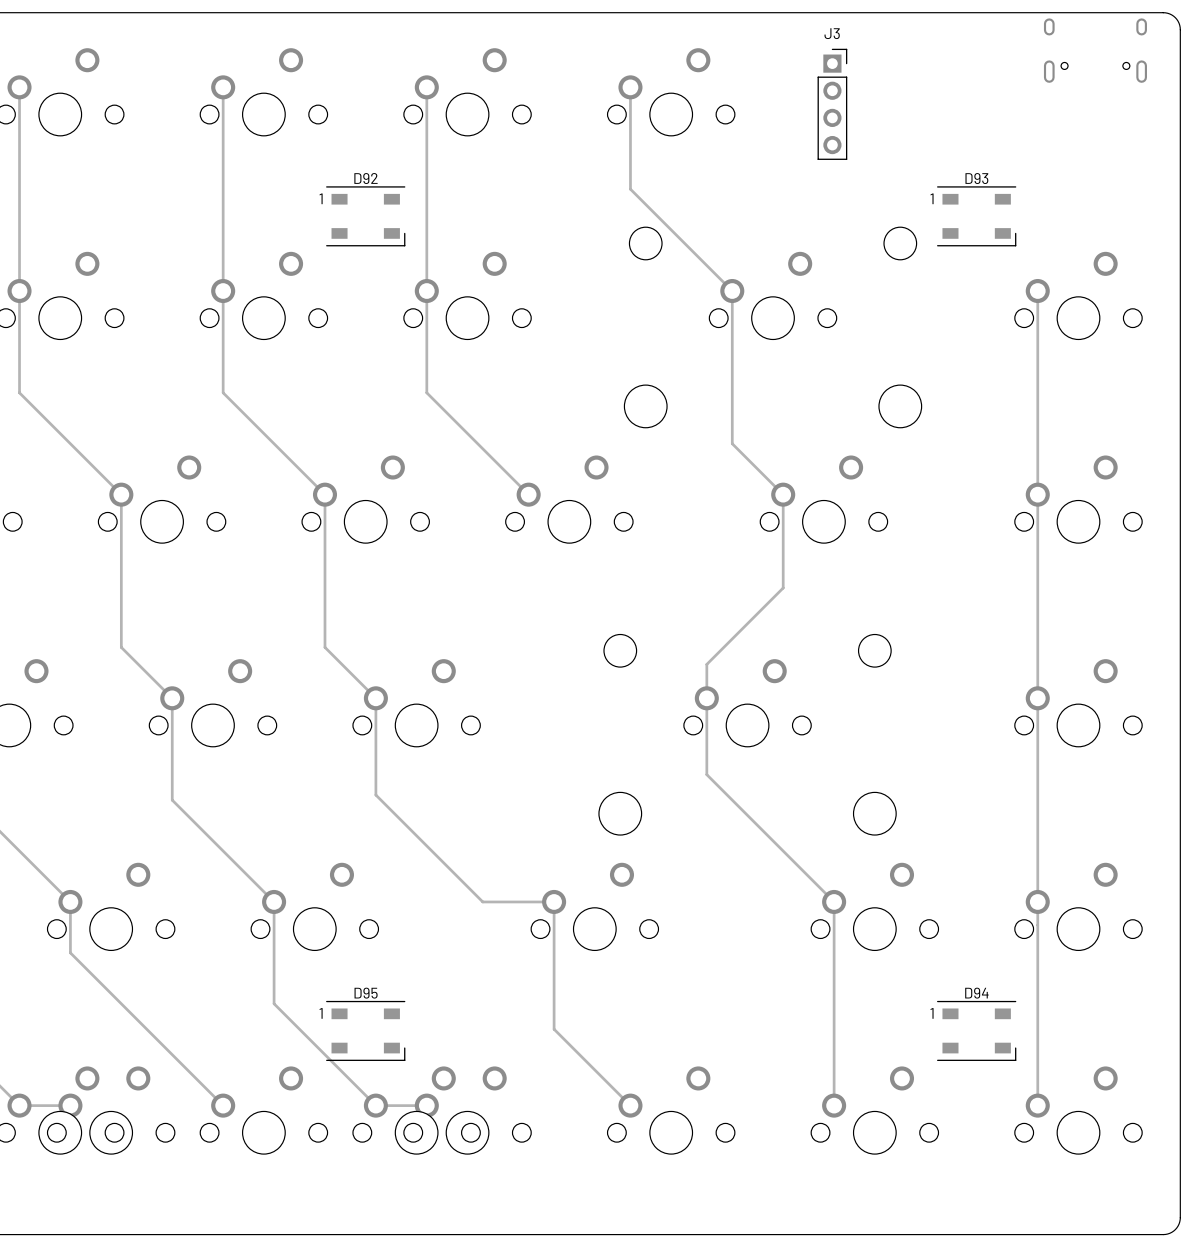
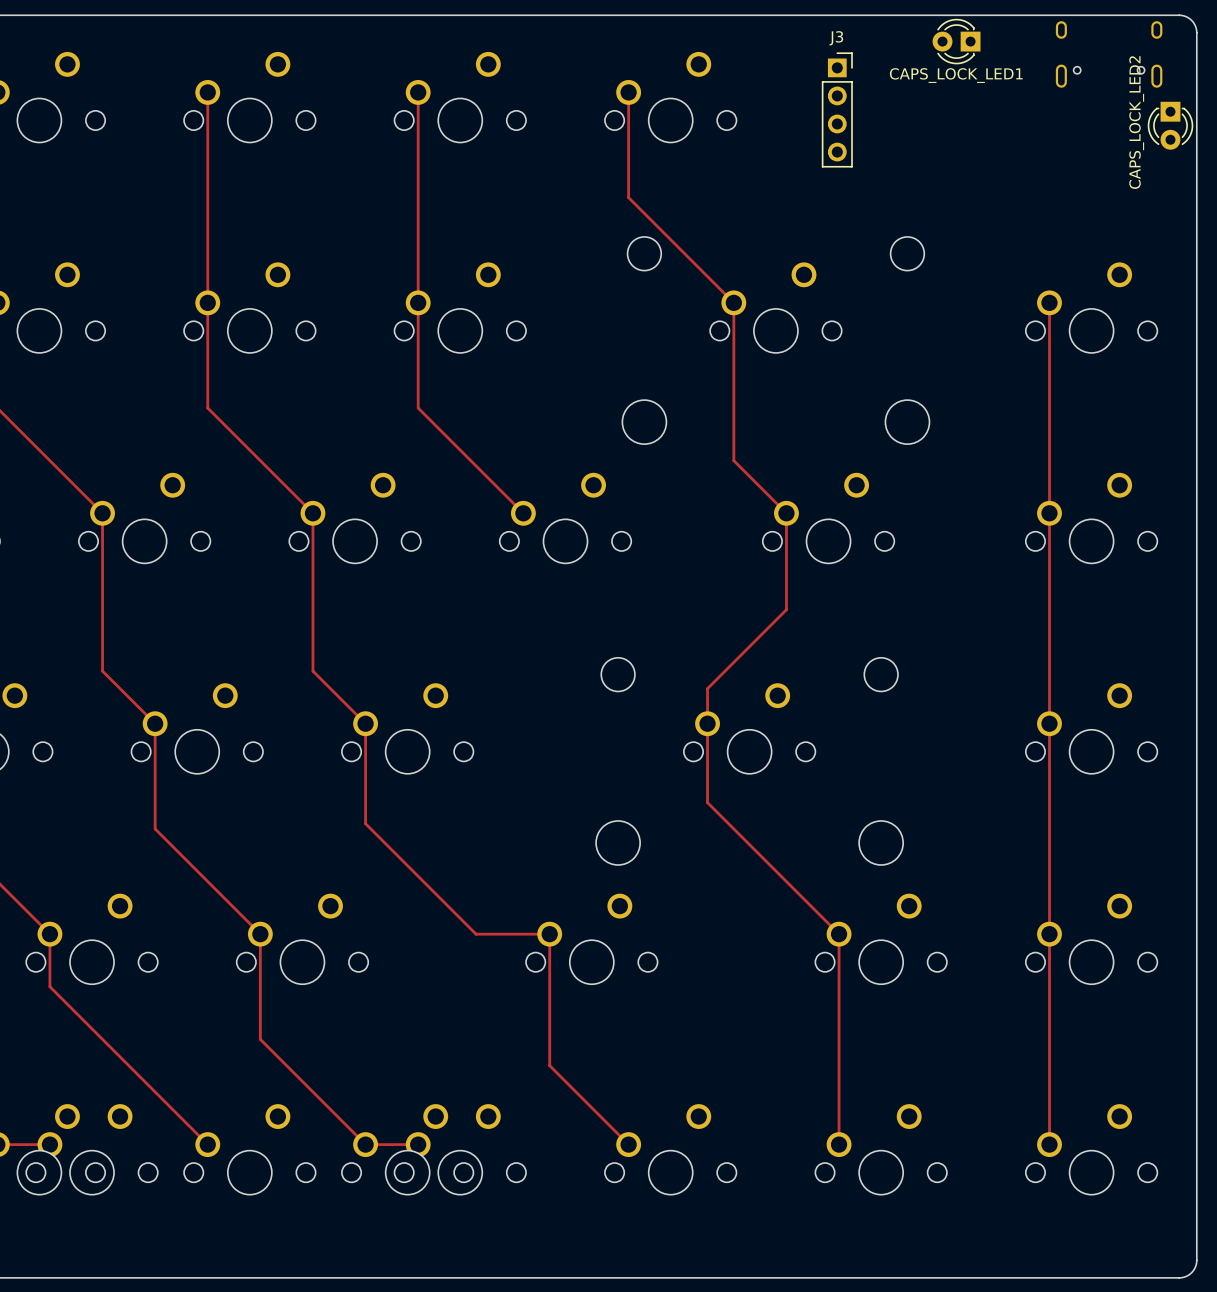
CAPS_LOCK_LED1: none -> (956, 41)
CAPS_LOCK_LED2: none -> (1170, 125)
D92: (365, 216) -> none
D93: (976, 216) -> none
D95: (365, 1030) -> none
D94: (976, 1030) -> none

